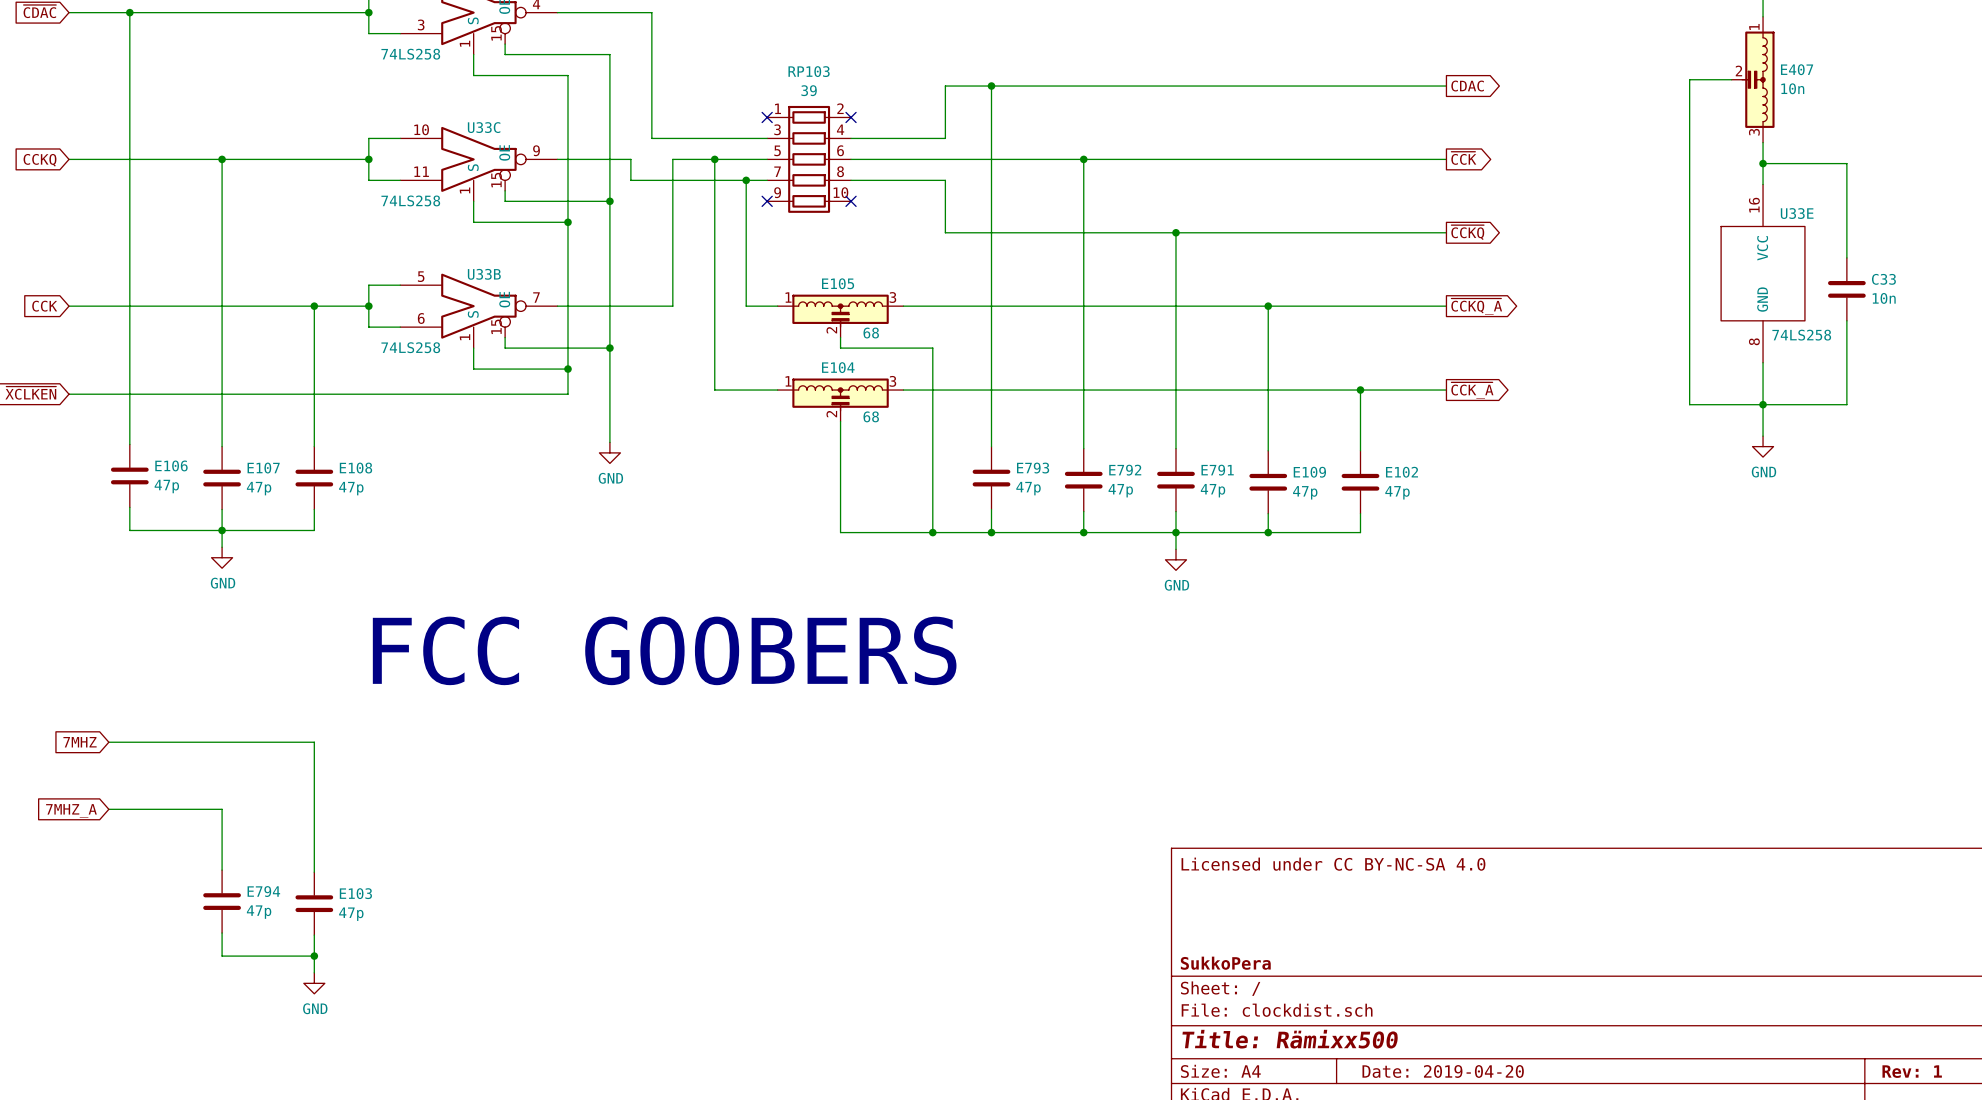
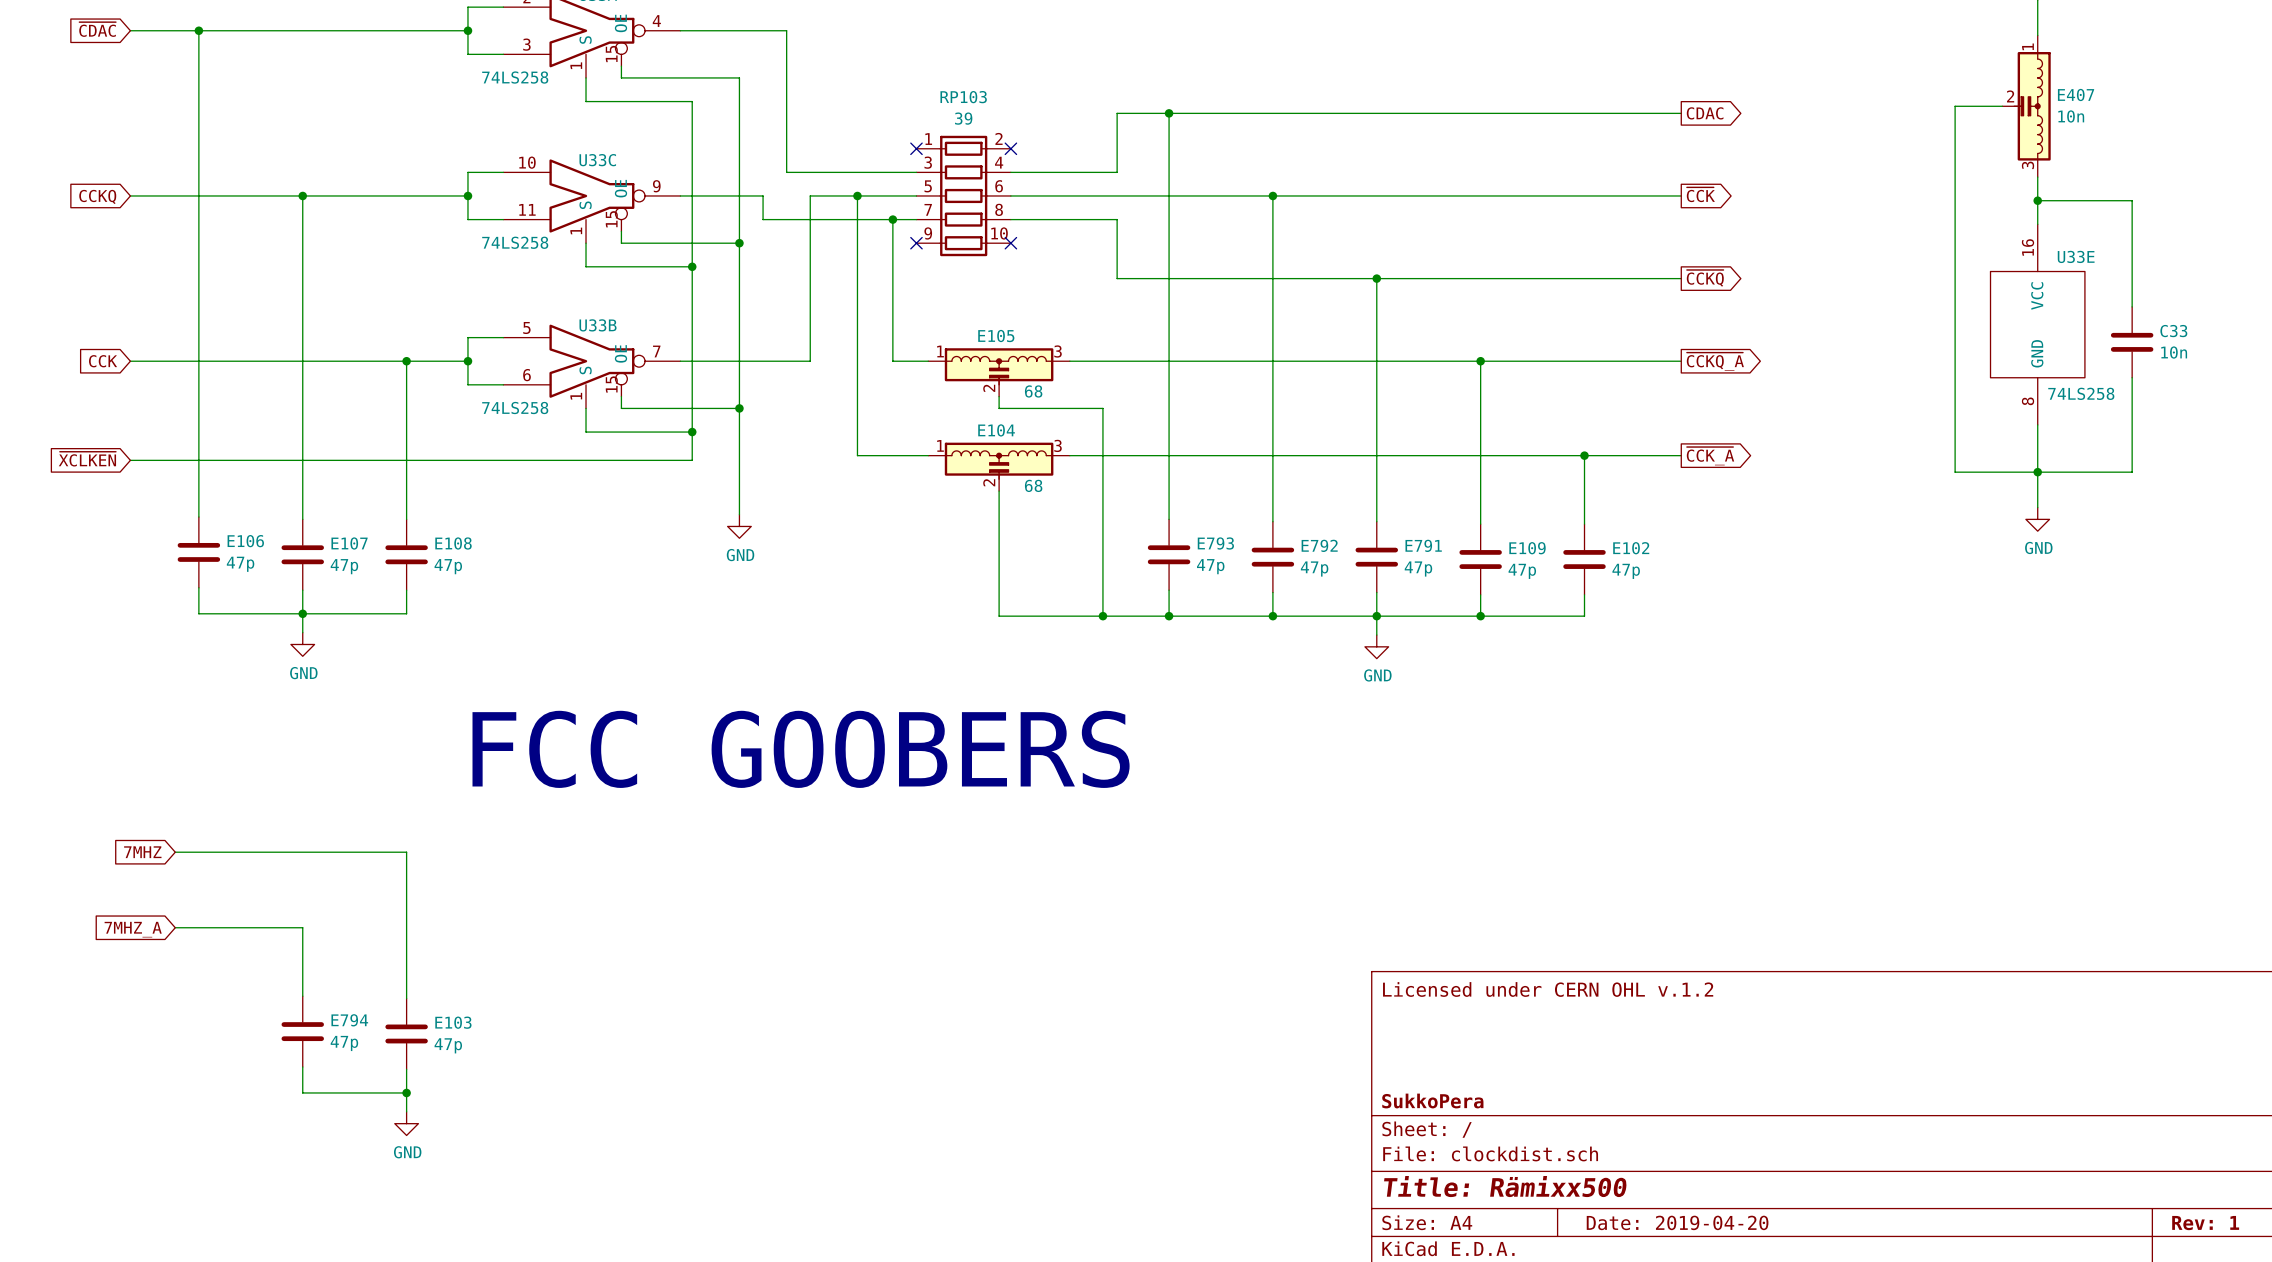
title block: Licensed under CC BY-NC-SA 4.0 (1333, 864) -> Licensed under CERN OHL v.1.2 (1548, 989)

